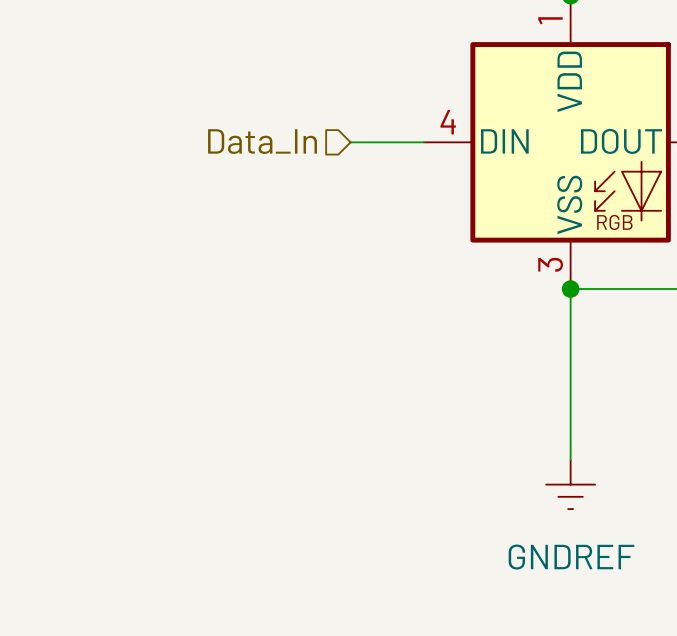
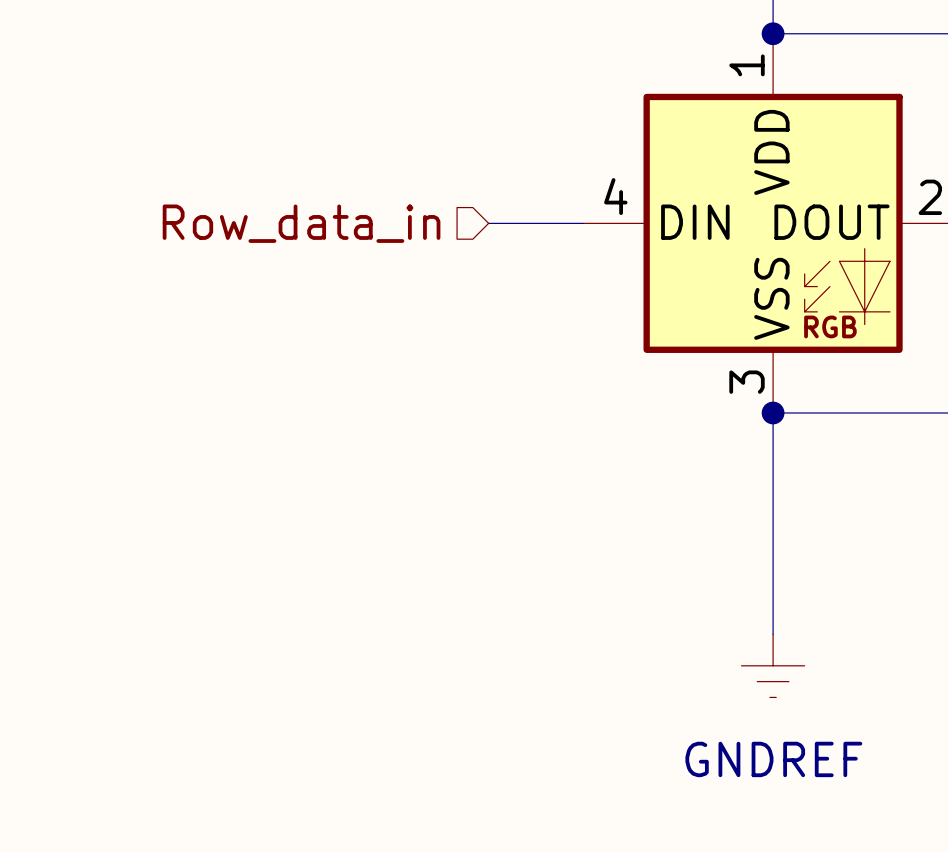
hierarchical label: Data_In (262, 141) -> Row_data_in (301, 223)

